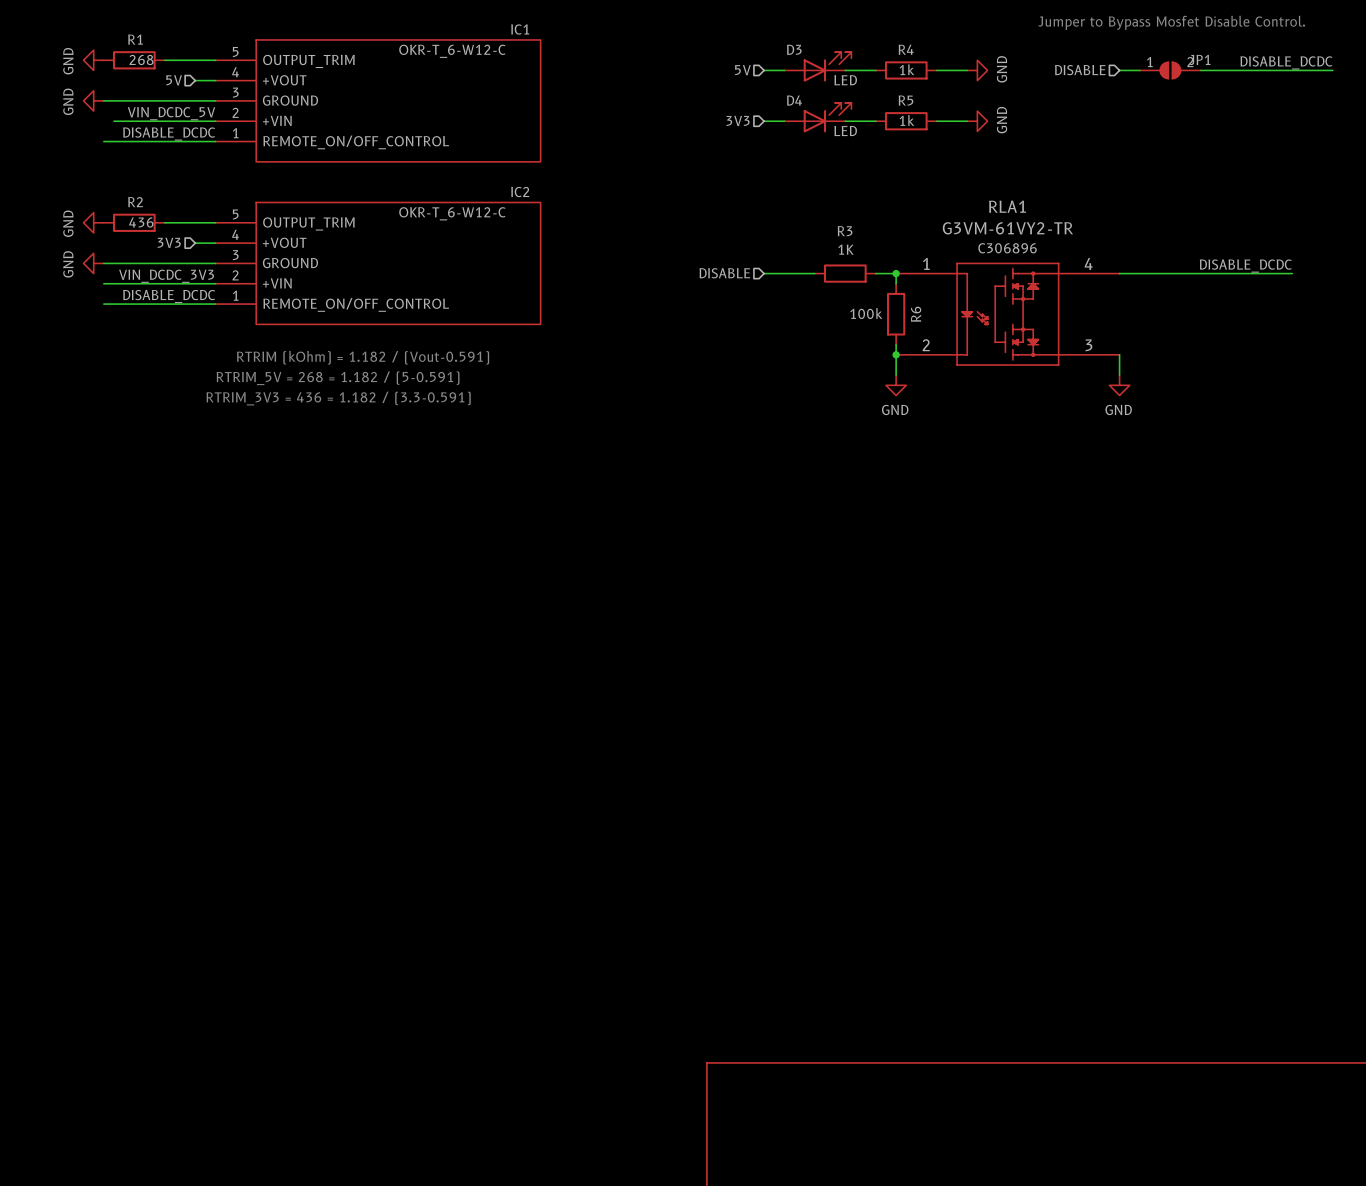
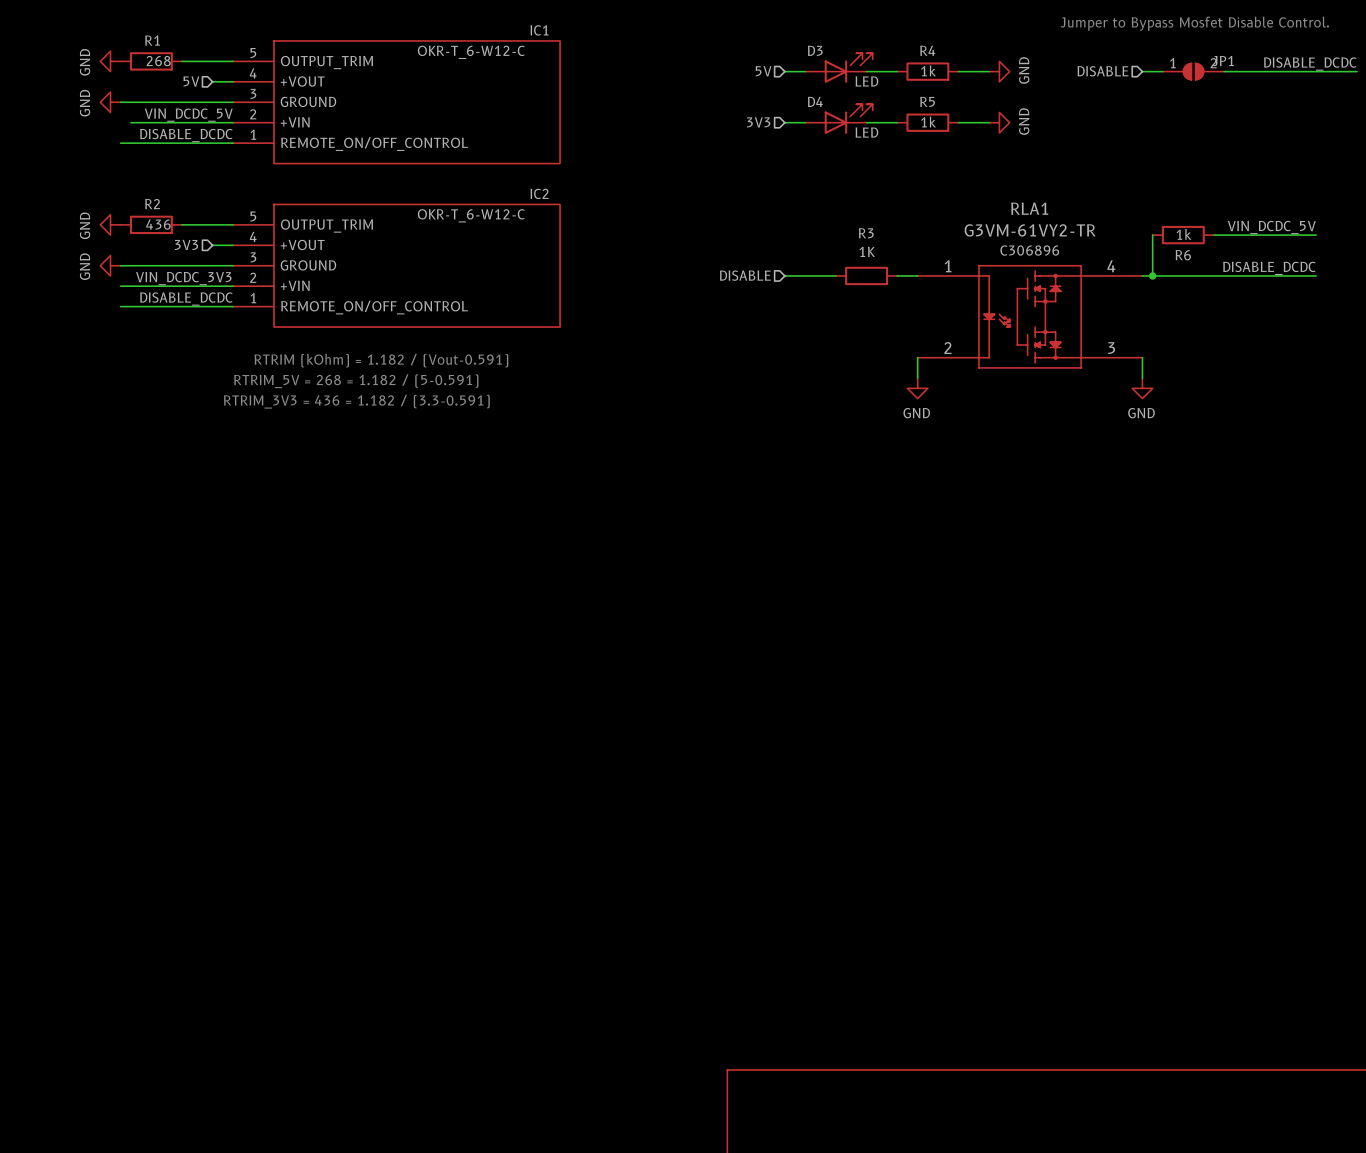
label: none -> VIN_DCDC_5V (1271, 227)
wire: none -> (1152, 235) (1152, 275)
wire: none -> (1213, 235) (1316, 235)
wire: (896, 273) (896, 283) -> none
junction: (896, 273) -> none
junction: none -> (1152, 275)
R6 value: 100k (866, 313) -> 1k (1183, 234)
R6 rotation: 0° (896, 314) -> 90° clockwise (1183, 235)
R6 position: (896, 314) -> (1183, 235)
wire: (896, 344) (896, 354) -> none
junction: (896, 354) -> none

